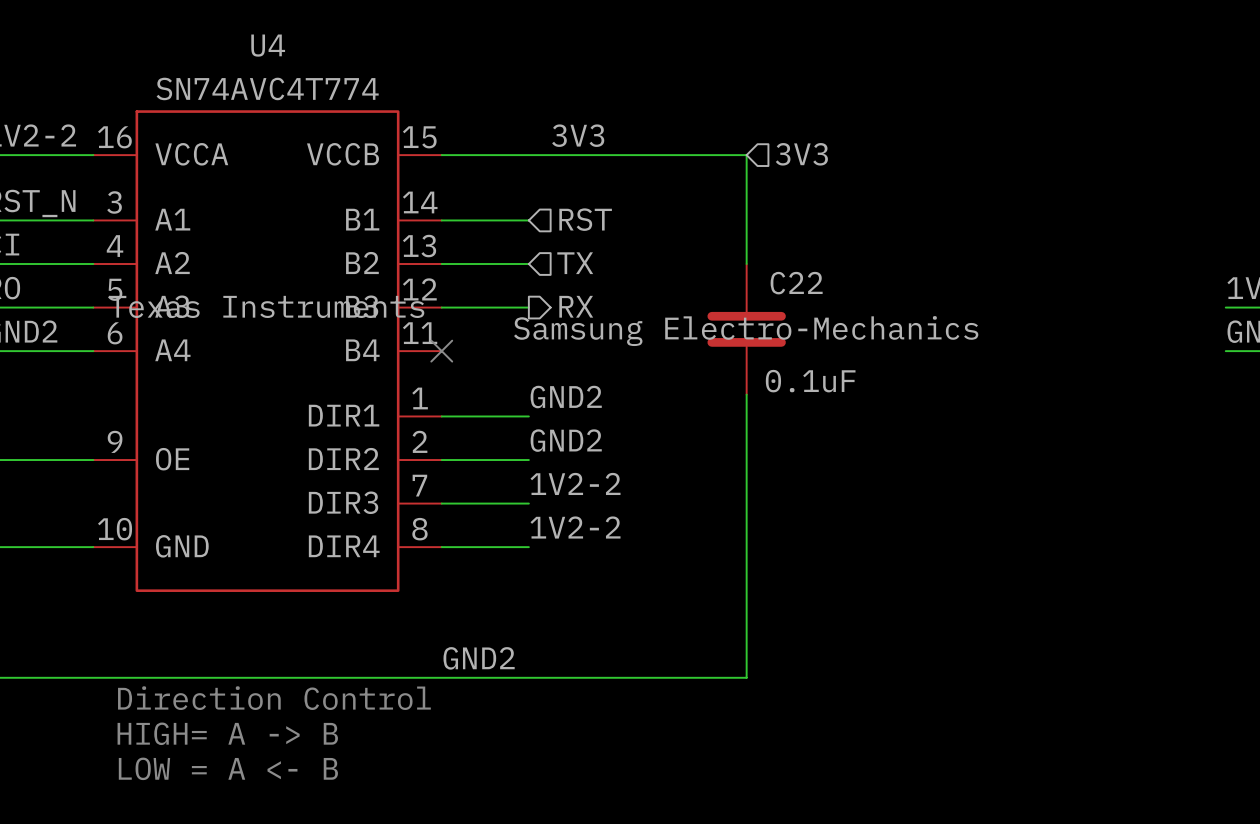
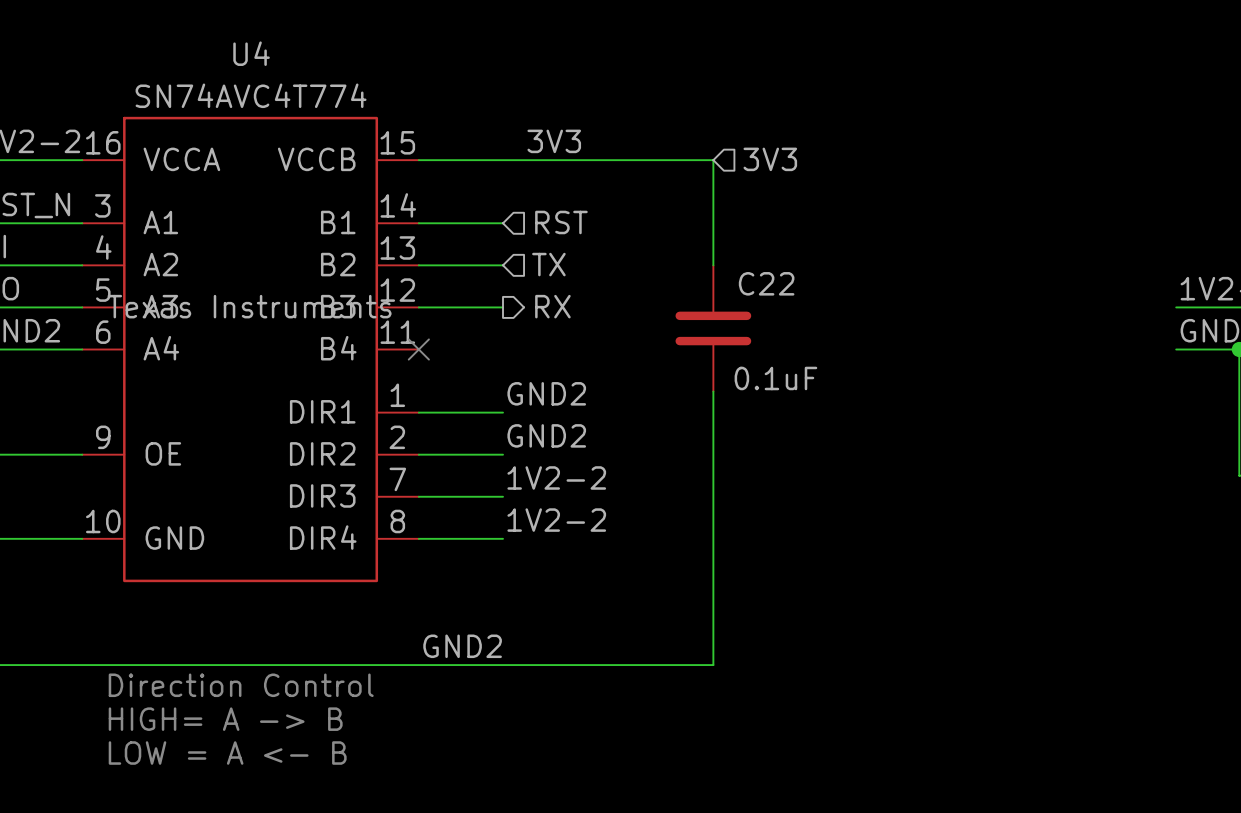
C22 text: Samsung Electro-Mechanics (746, 331) -> none

